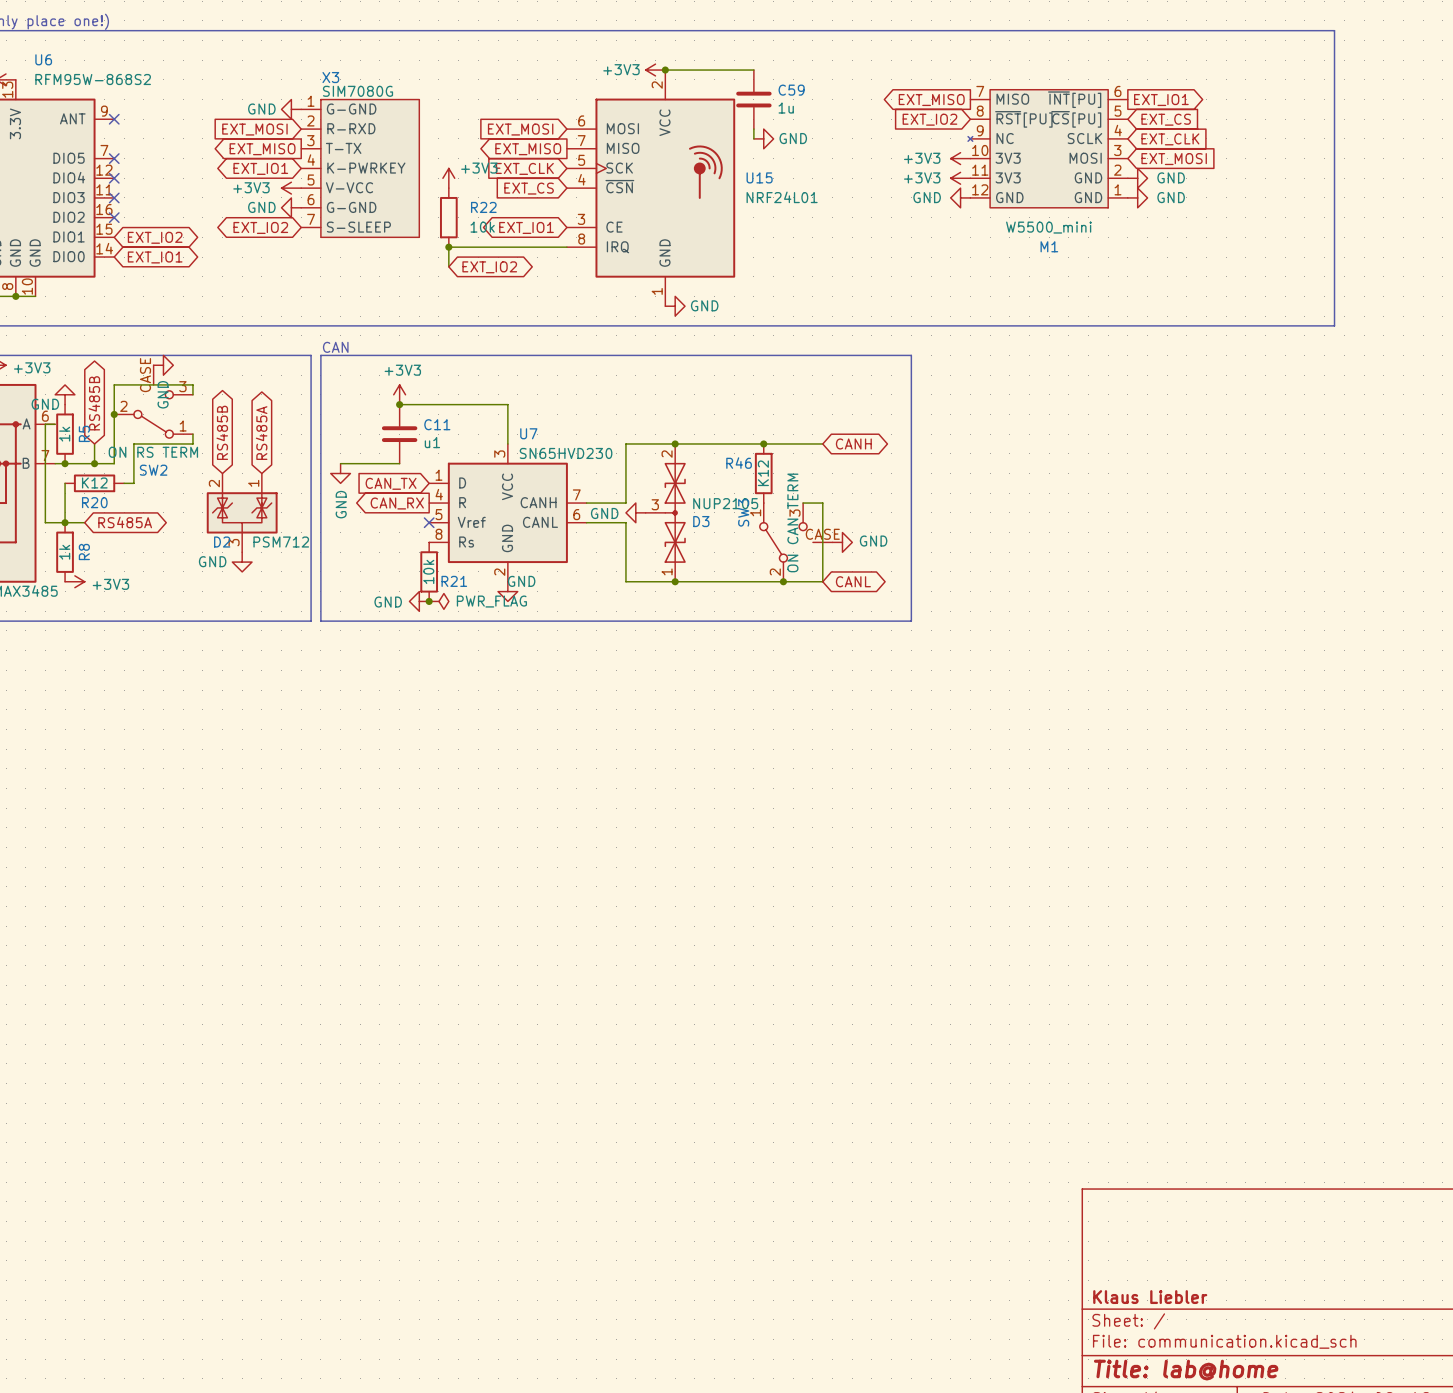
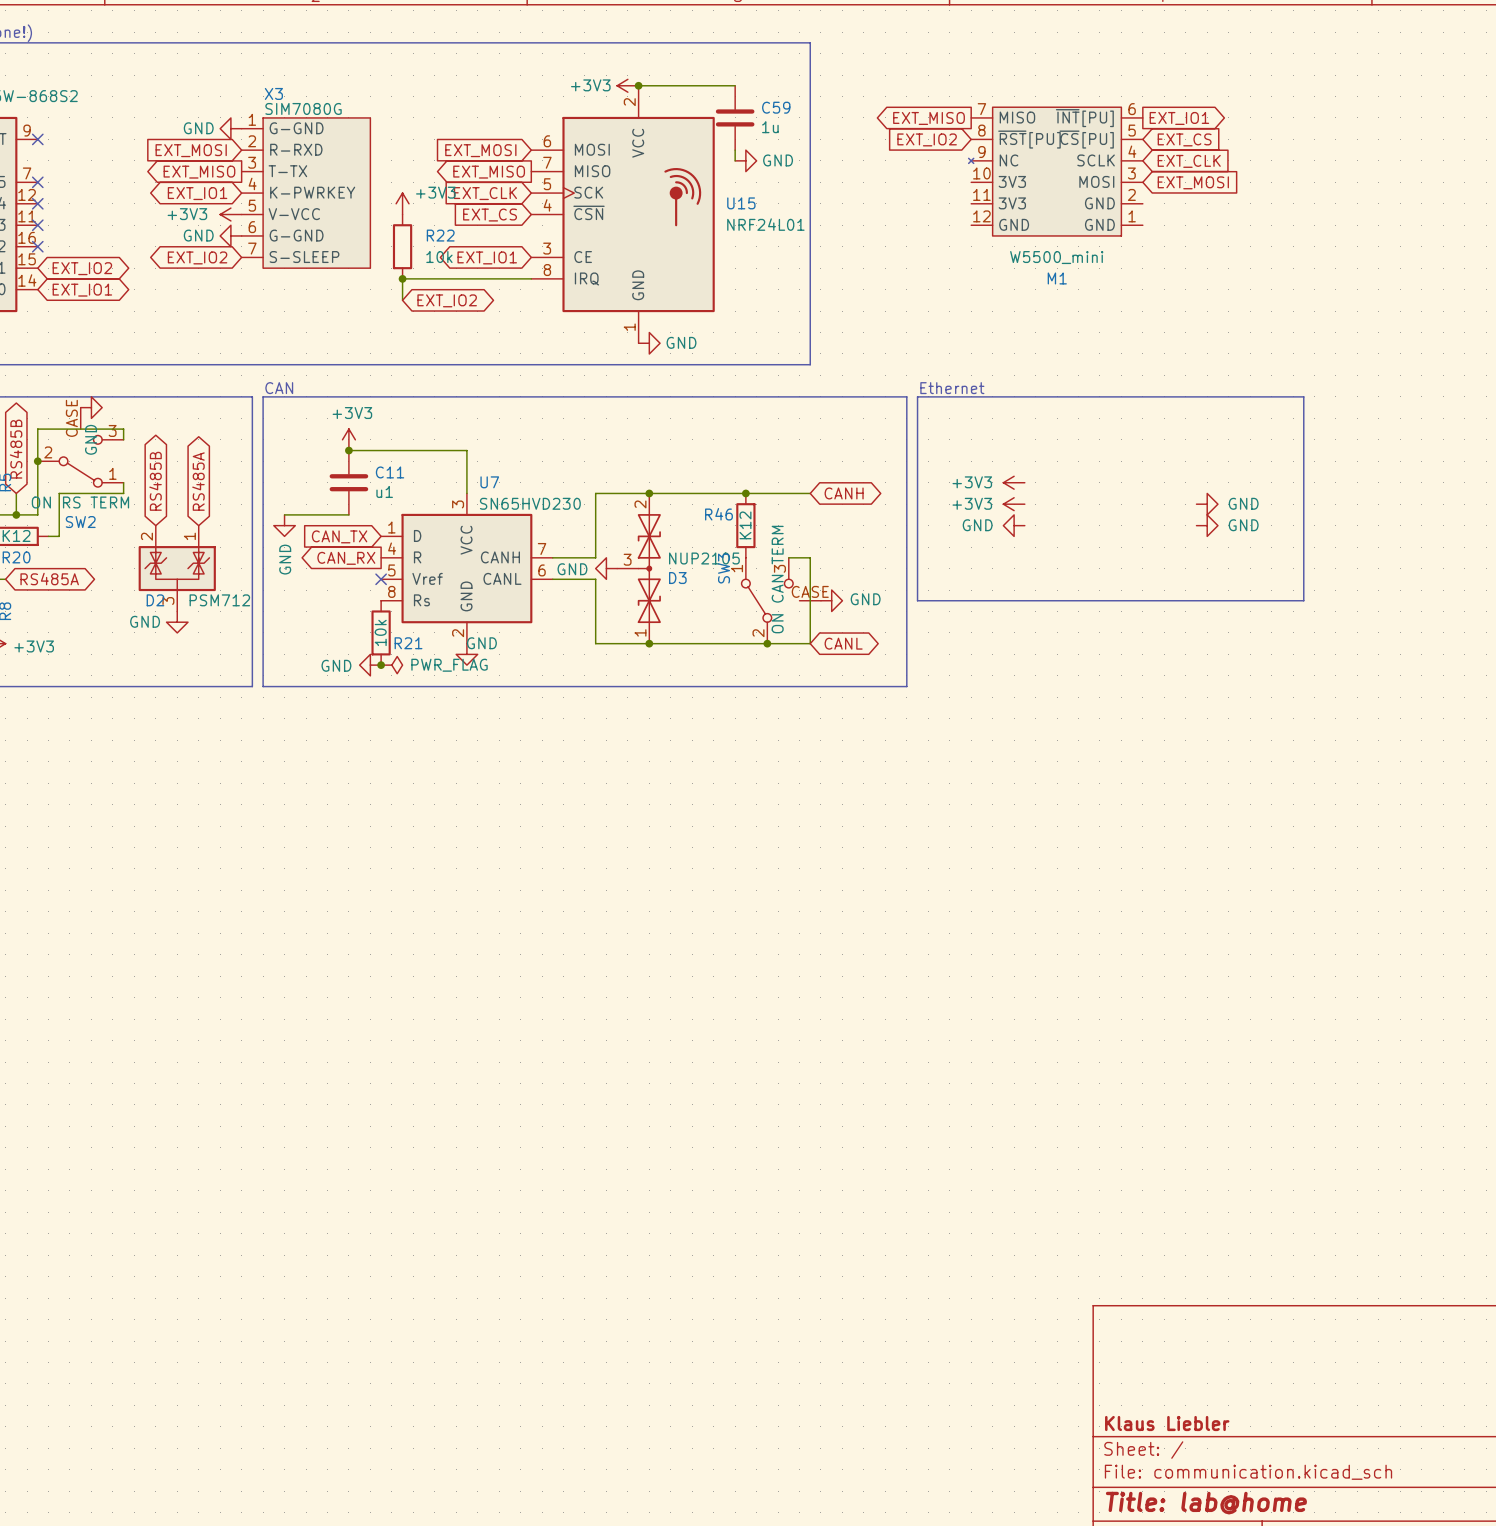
line: (822, 30) (1334, 30) (1334, 325) (822, 325) -> (810, 42) (810, 364)
power symbol: +3V3 (960, 158) -> none
power symbol: +3V3 (960, 178) -> none
power symbol: GND (1137, 178) -> none
power symbol: GND (960, 197) -> none
power symbol: GND (1137, 197) -> none
text: none -> Ethernet (952, 388)
line: none -> (917, 396) (917, 600) (1303, 600) (1303, 396) (917, 396)
power symbol: none -> +3V3 (1014, 482)
power symbol: none -> +3V3 (1014, 504)
power symbol: none -> GND (1207, 504)
power symbol: none -> GND (1014, 525)
power symbol: none -> GND (1207, 525)

